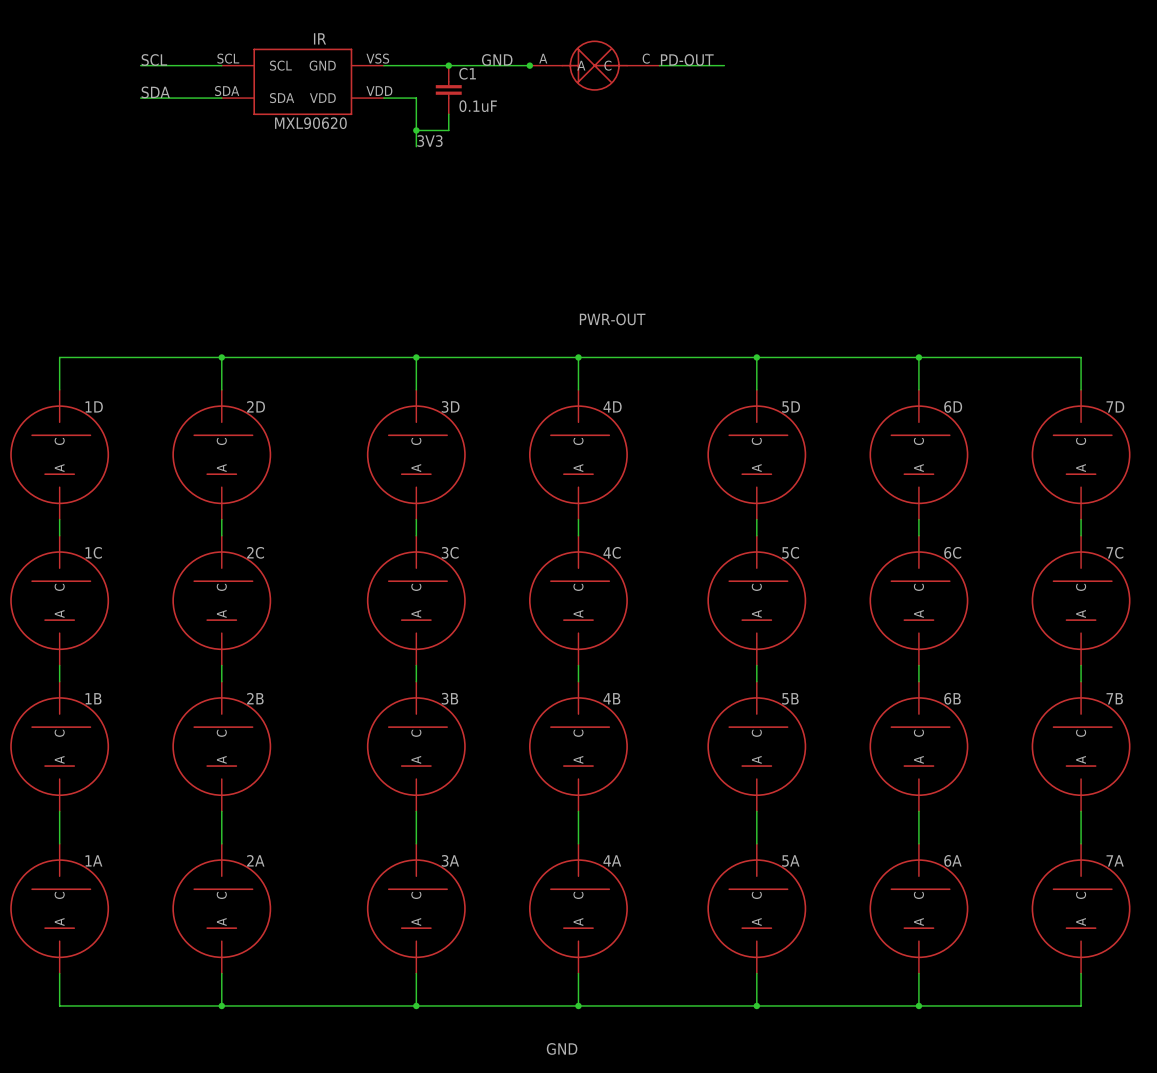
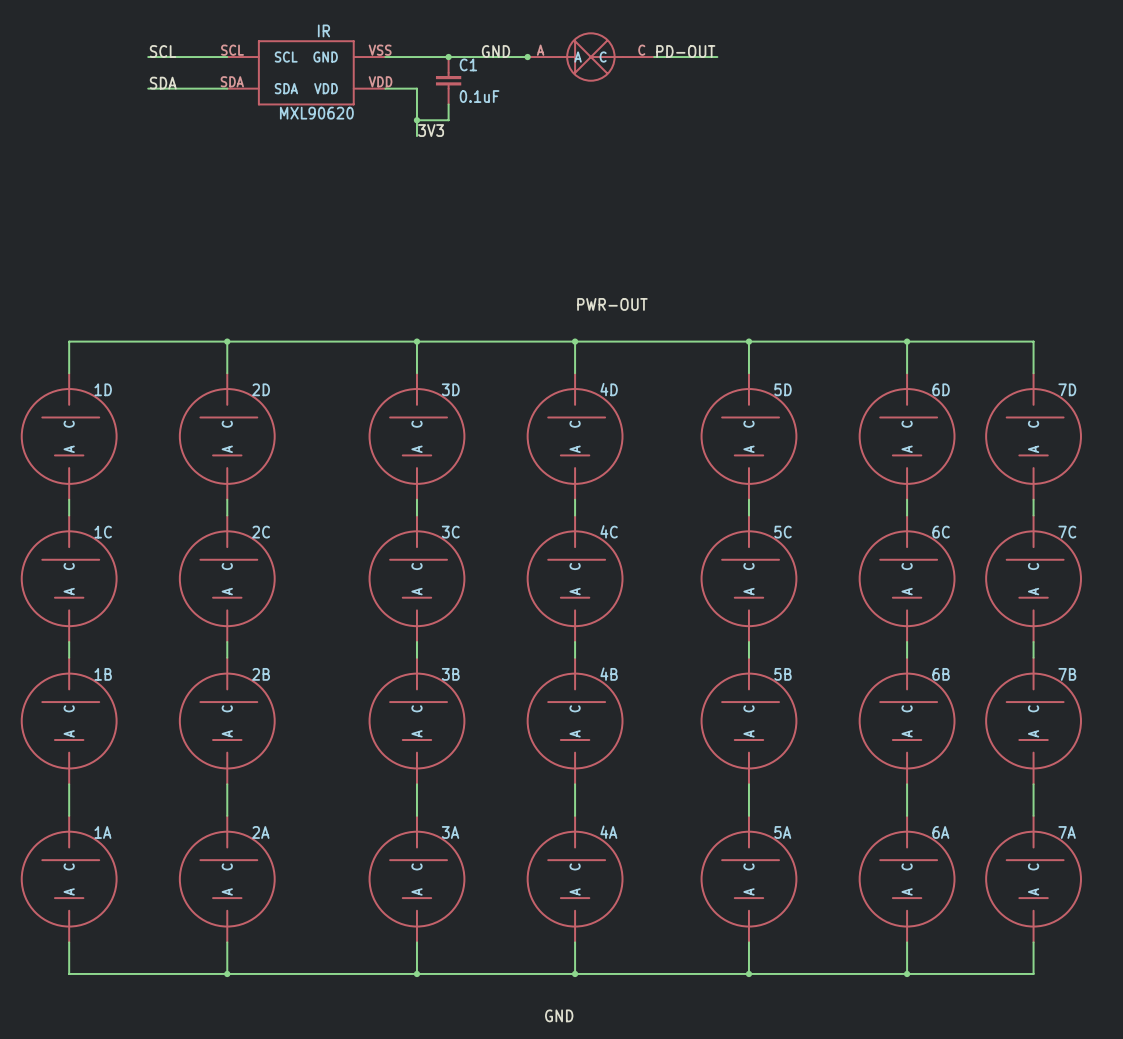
wire: (1048, 357) (1081, 357) (1081, 389) -> (1033, 341) (1033, 373)
7D position: (1081, 454) -> (1033, 436)
wire: (1081, 519) (1081, 535) -> (1033, 499) (1033, 515)
7C position: (1081, 600) -> (1033, 578)
wire: (1081, 665) (1081, 681) -> (1033, 641) (1033, 657)
7B position: (1081, 746) -> (1033, 721)
wire: (1081, 811) (1081, 843) -> (1033, 784) (1033, 815)
7A position: (1081, 908) -> (1033, 879)
wire: (1081, 973) (1081, 1005) (1048, 1005) -> (1033, 942) (1033, 973)

